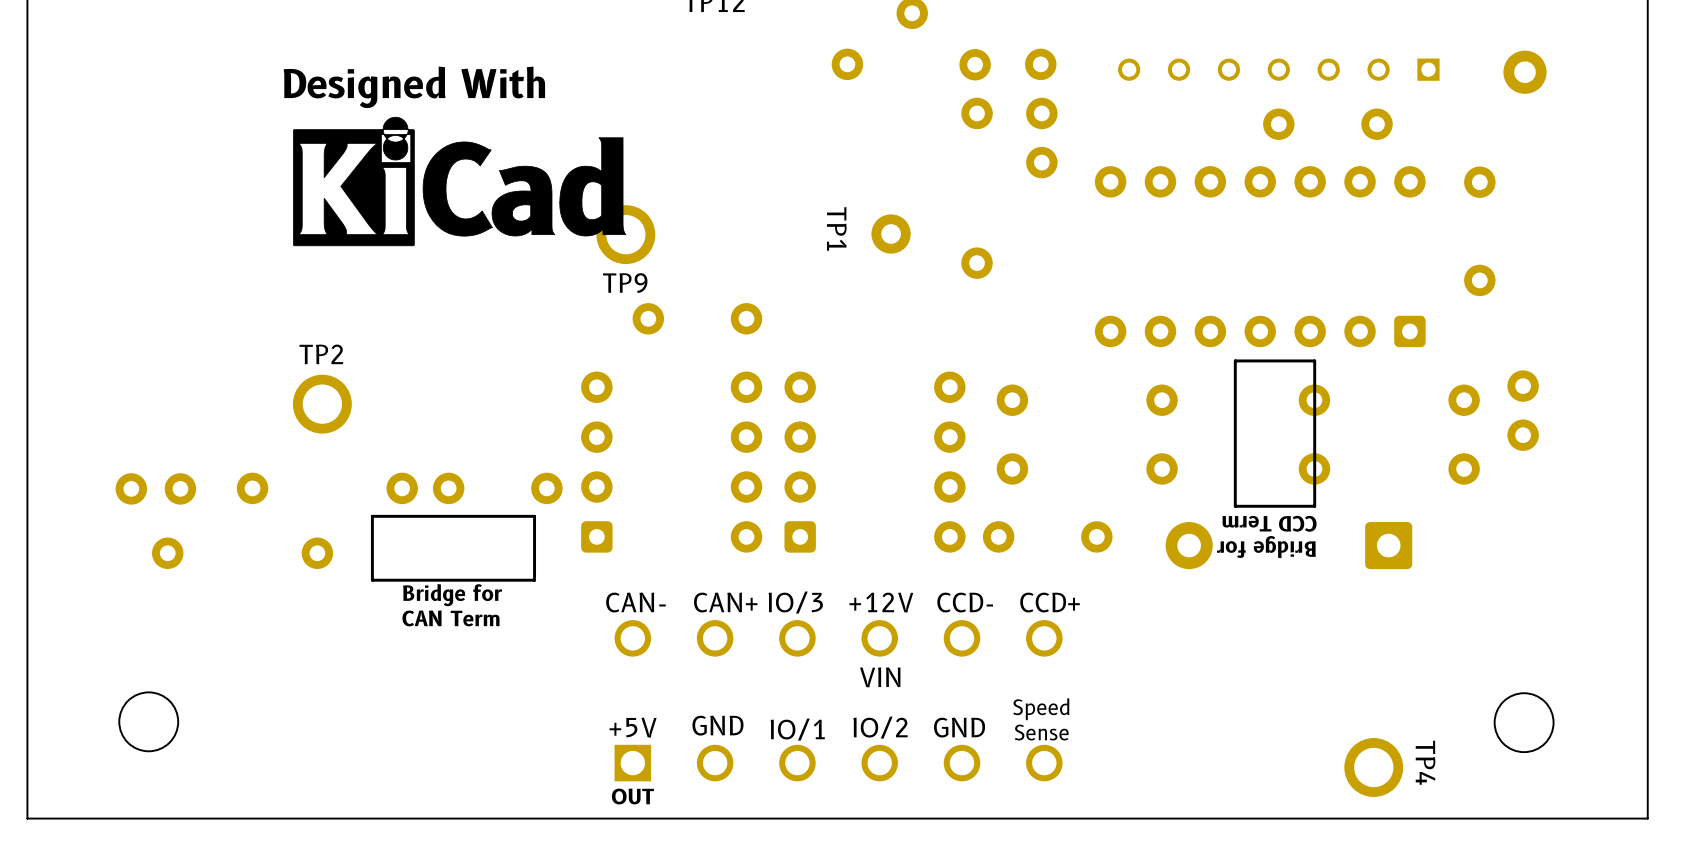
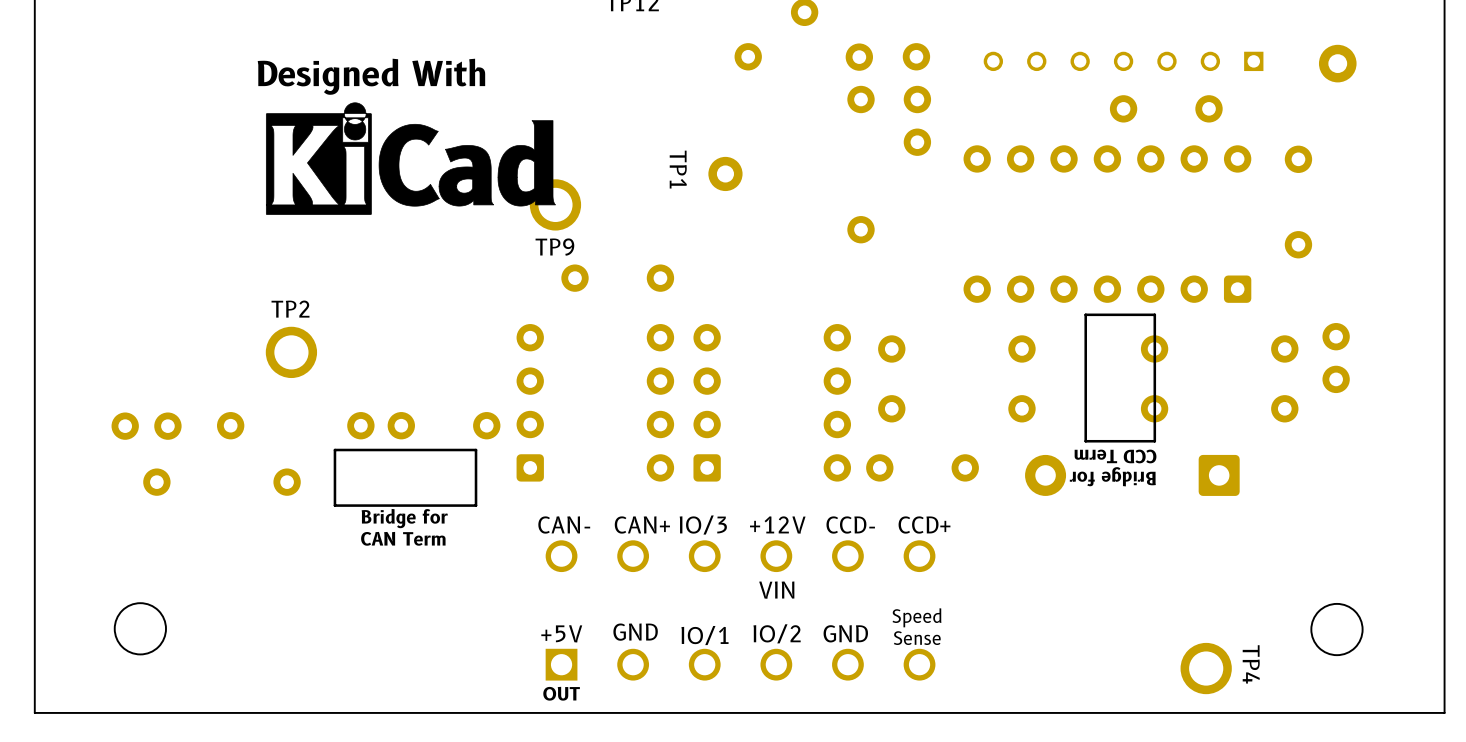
TP1 position: (891, 233) -> (725, 173)

